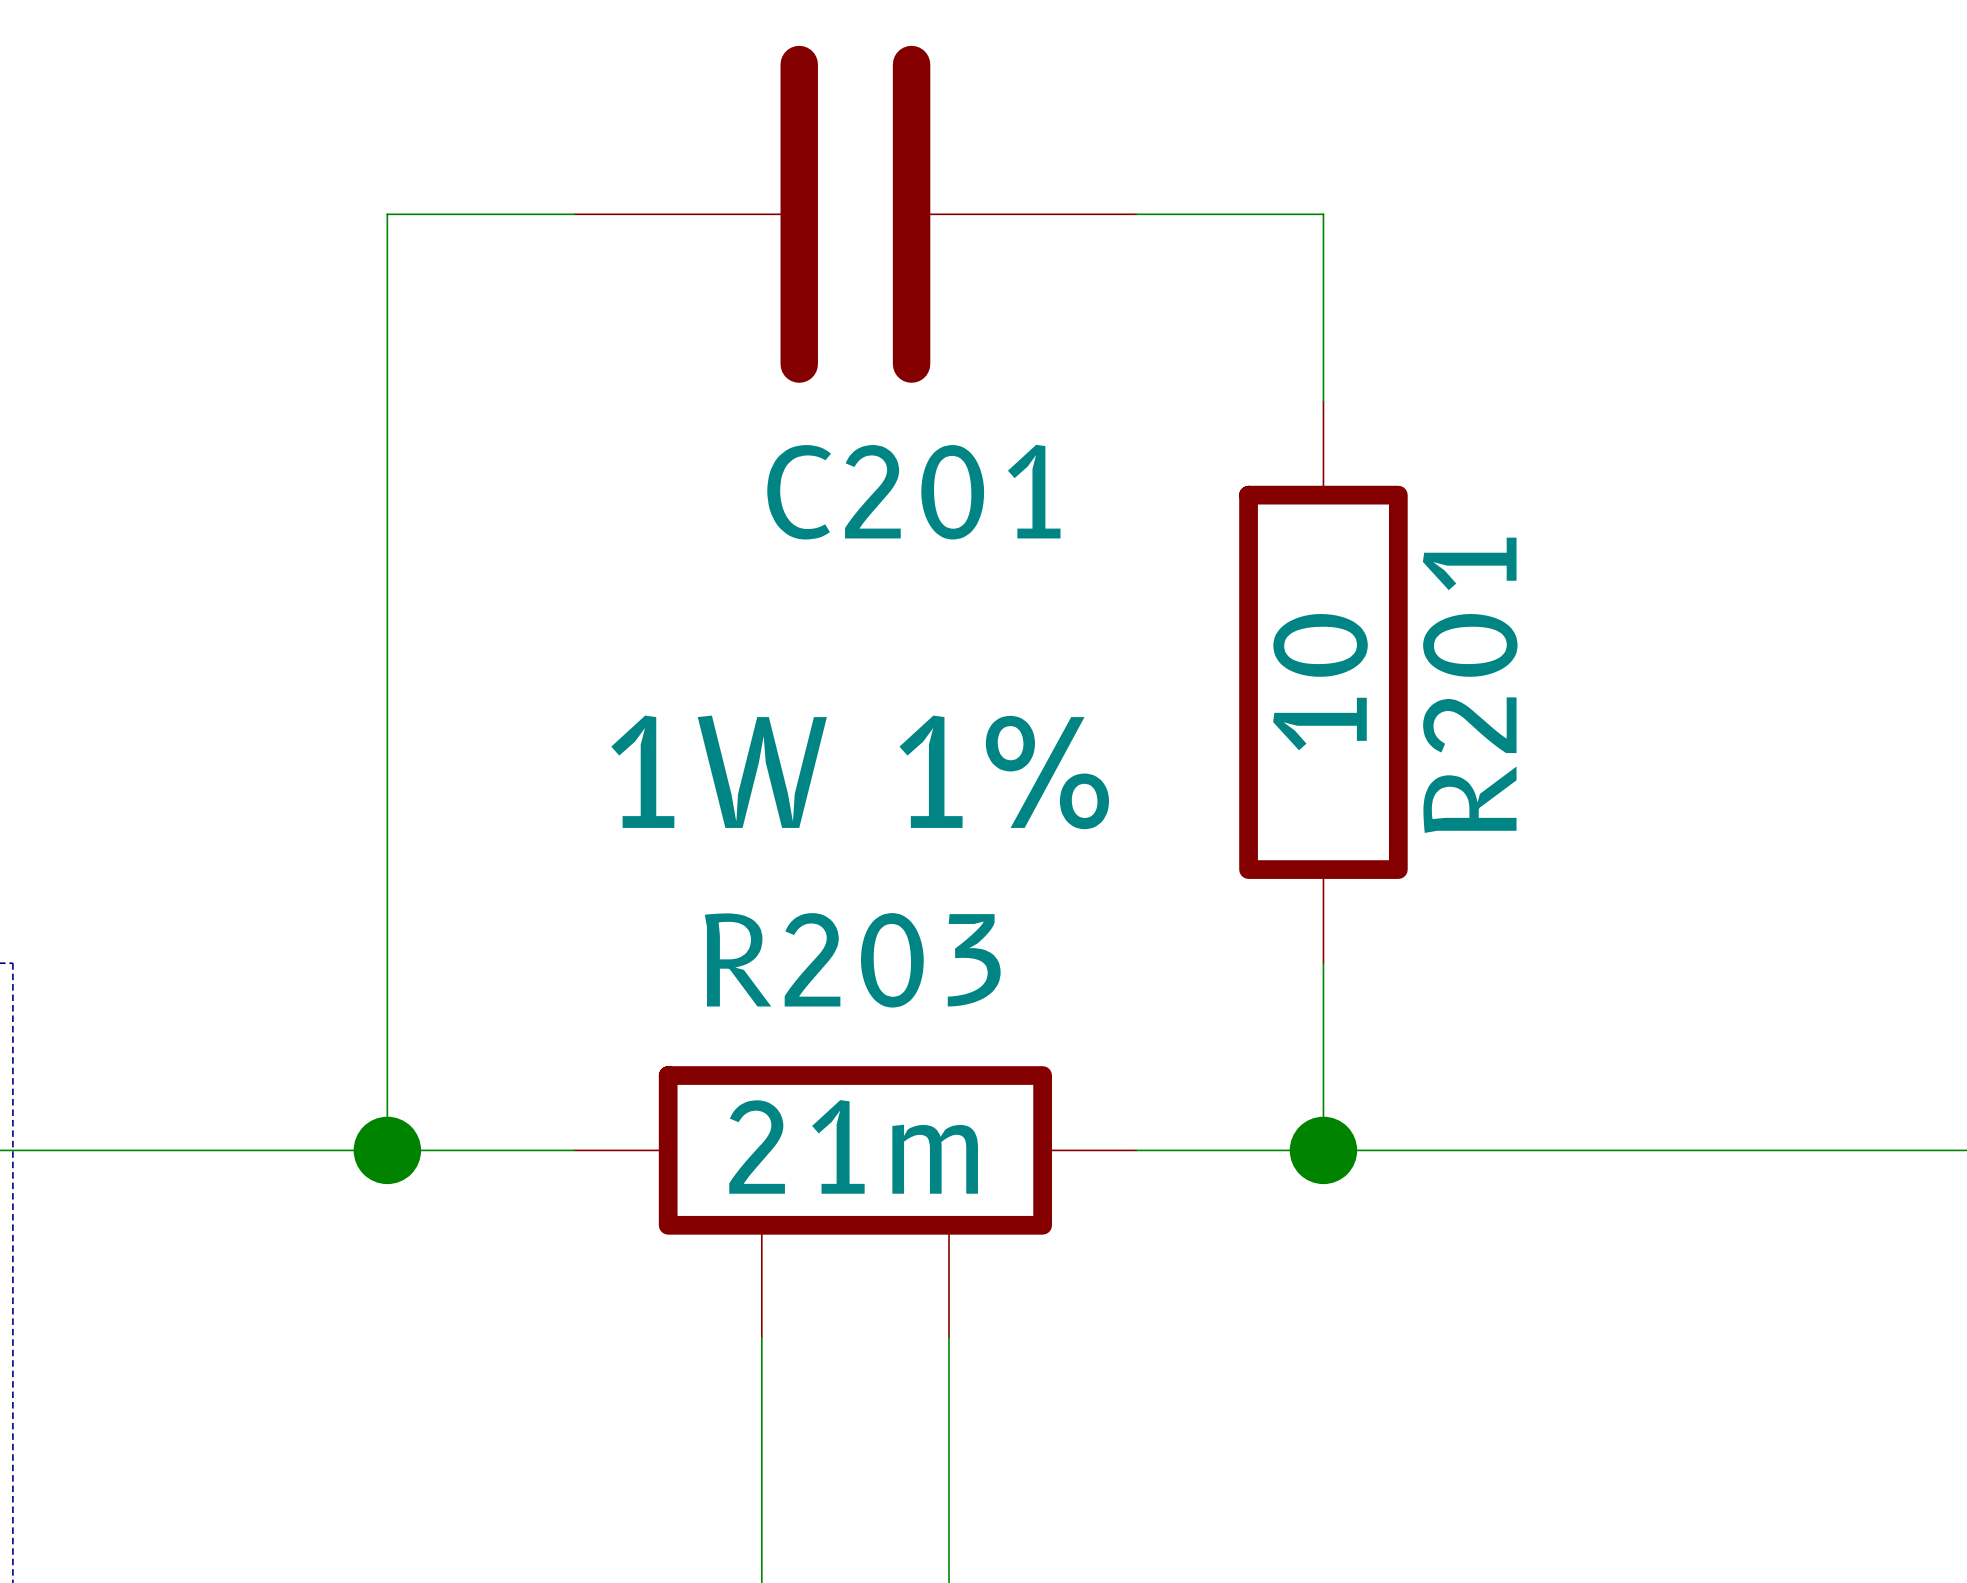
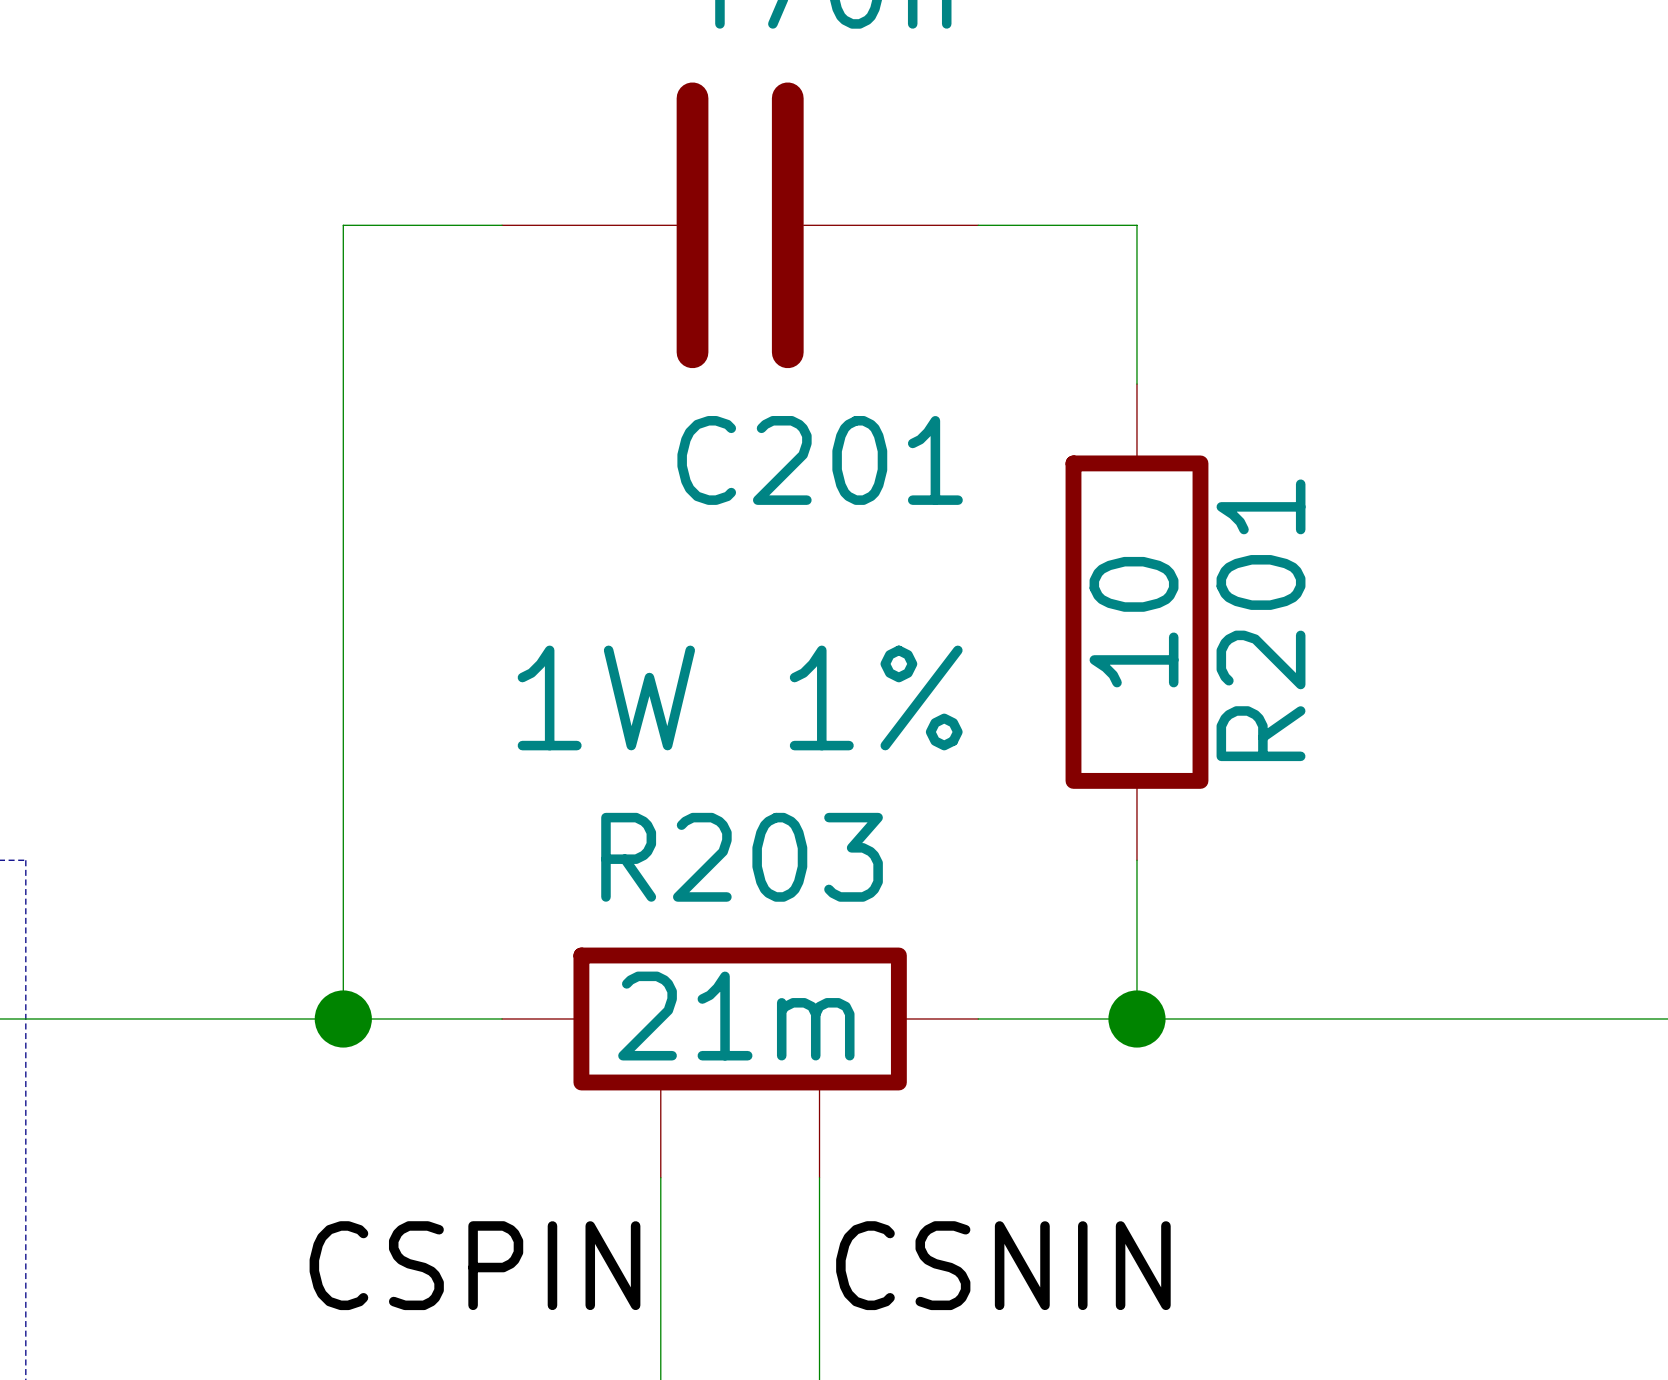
label: none -> CSPIN (474, 1265)
label: none -> CSNIN (1003, 1265)

